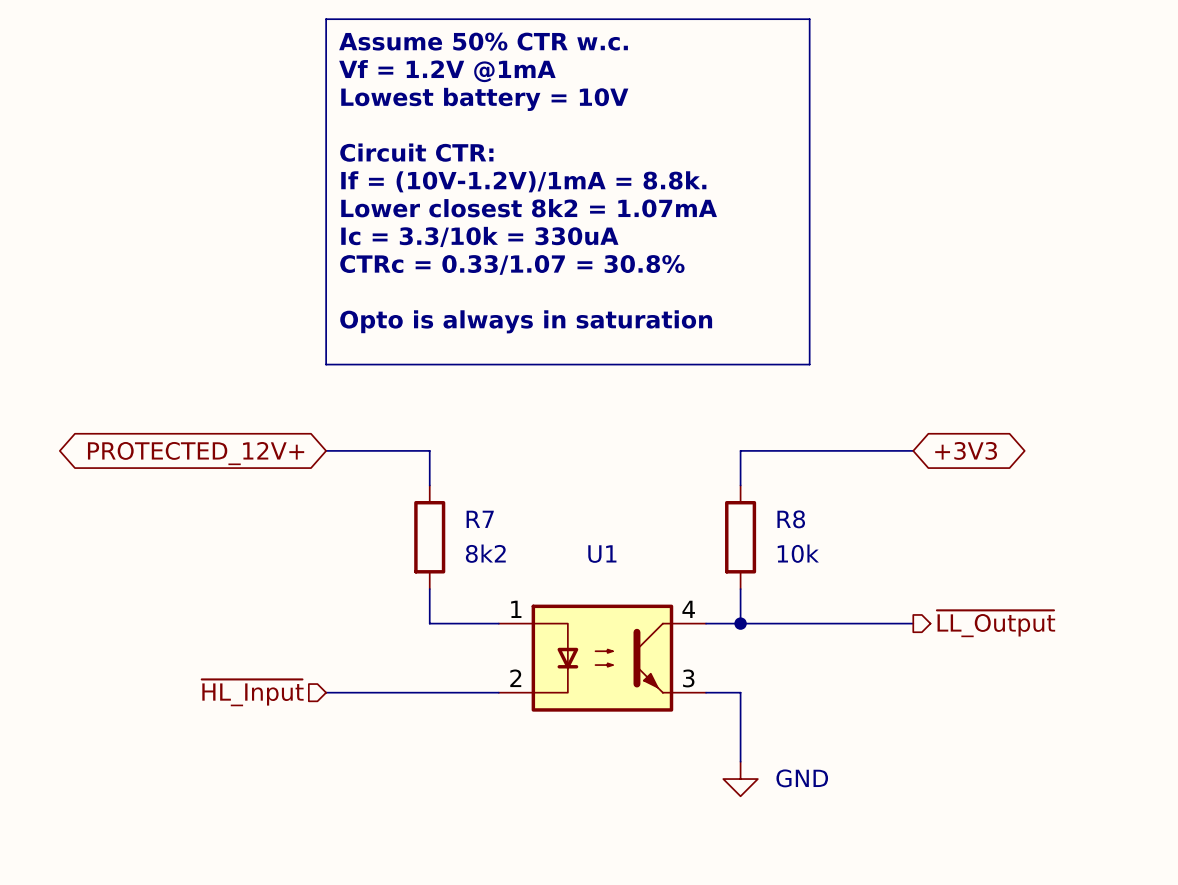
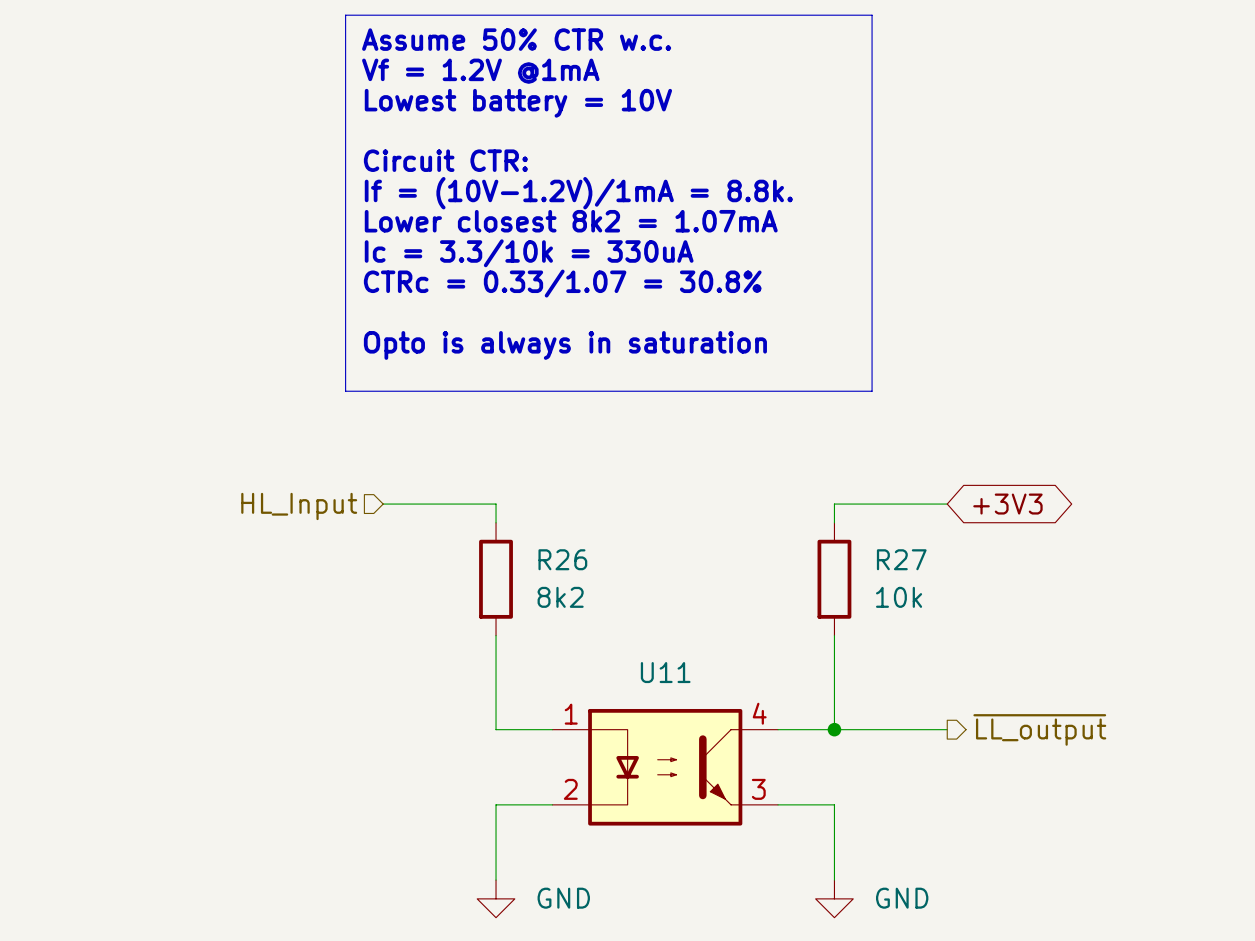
wire: (326, 450) (429, 450) (429, 485) -> none
wire: (913, 450) (740, 450) (740, 485) -> none
global label position: +3V3 (966, 450) -> +3V3 (1007, 504)
global label: PROTECTED_12V+ (196, 453) -> none
wire: none -> (383, 504) (496, 504) (496, 522)
wire: none -> (947, 504) (834, 504) (834, 522)
hierarchical label: none -> HL_Input (299, 506)
R7: 8k2 (429, 537) -> none
R26: none -> 8k2 (496, 579)
R8: 10k (740, 537) -> none
R27: none -> 10k (834, 579)
wire: (429, 589) (429, 623) (498, 623) -> none
wire: none -> (496, 635) (496, 729) (552, 729)
wire: (740, 589) (740, 623) -> none
wire: none -> (834, 635) (834, 729)
wire: (706, 623) (913, 623) -> none
junction position: (740, 623) -> (834, 729)
hierarchical label: ~{LL_Output} (996, 623) -> none
U1: (602, 658) -> none
wire: none -> (778, 729) (947, 729)
hierarchical label: none -> ~{LL_output} (1039, 729)
hierarchical label: ~{HL_Input} (252, 692) -> none
wire: (326, 692) (498, 692) -> none
wire: (706, 692) (740, 692) (740, 761) -> none
U11: none -> (665, 767)
wire: none -> (552, 804) (496, 804) (496, 880)
wire: none -> (778, 804) (834, 804) (834, 880)
power symbol position: GND (740, 779) -> GND (834, 898)
power symbol: none -> GND (496, 898)

